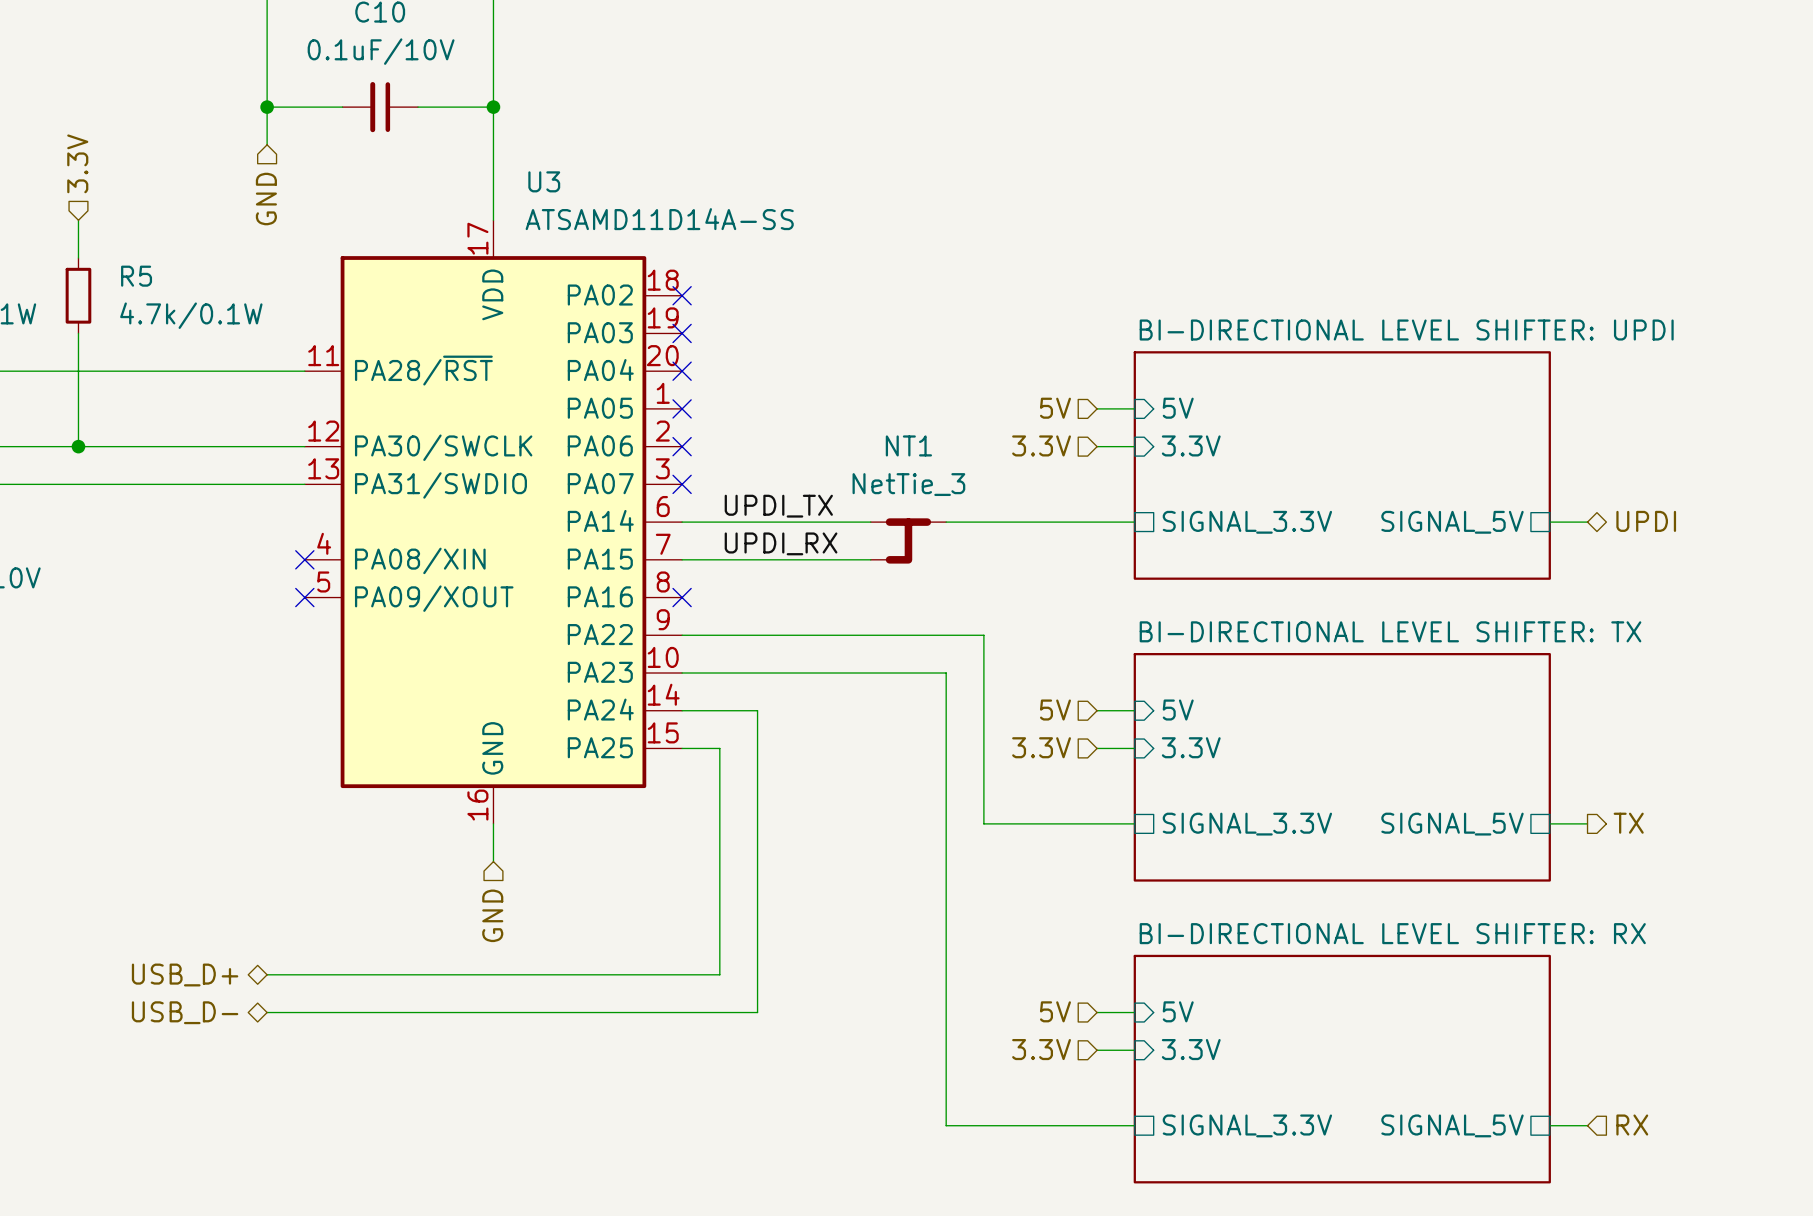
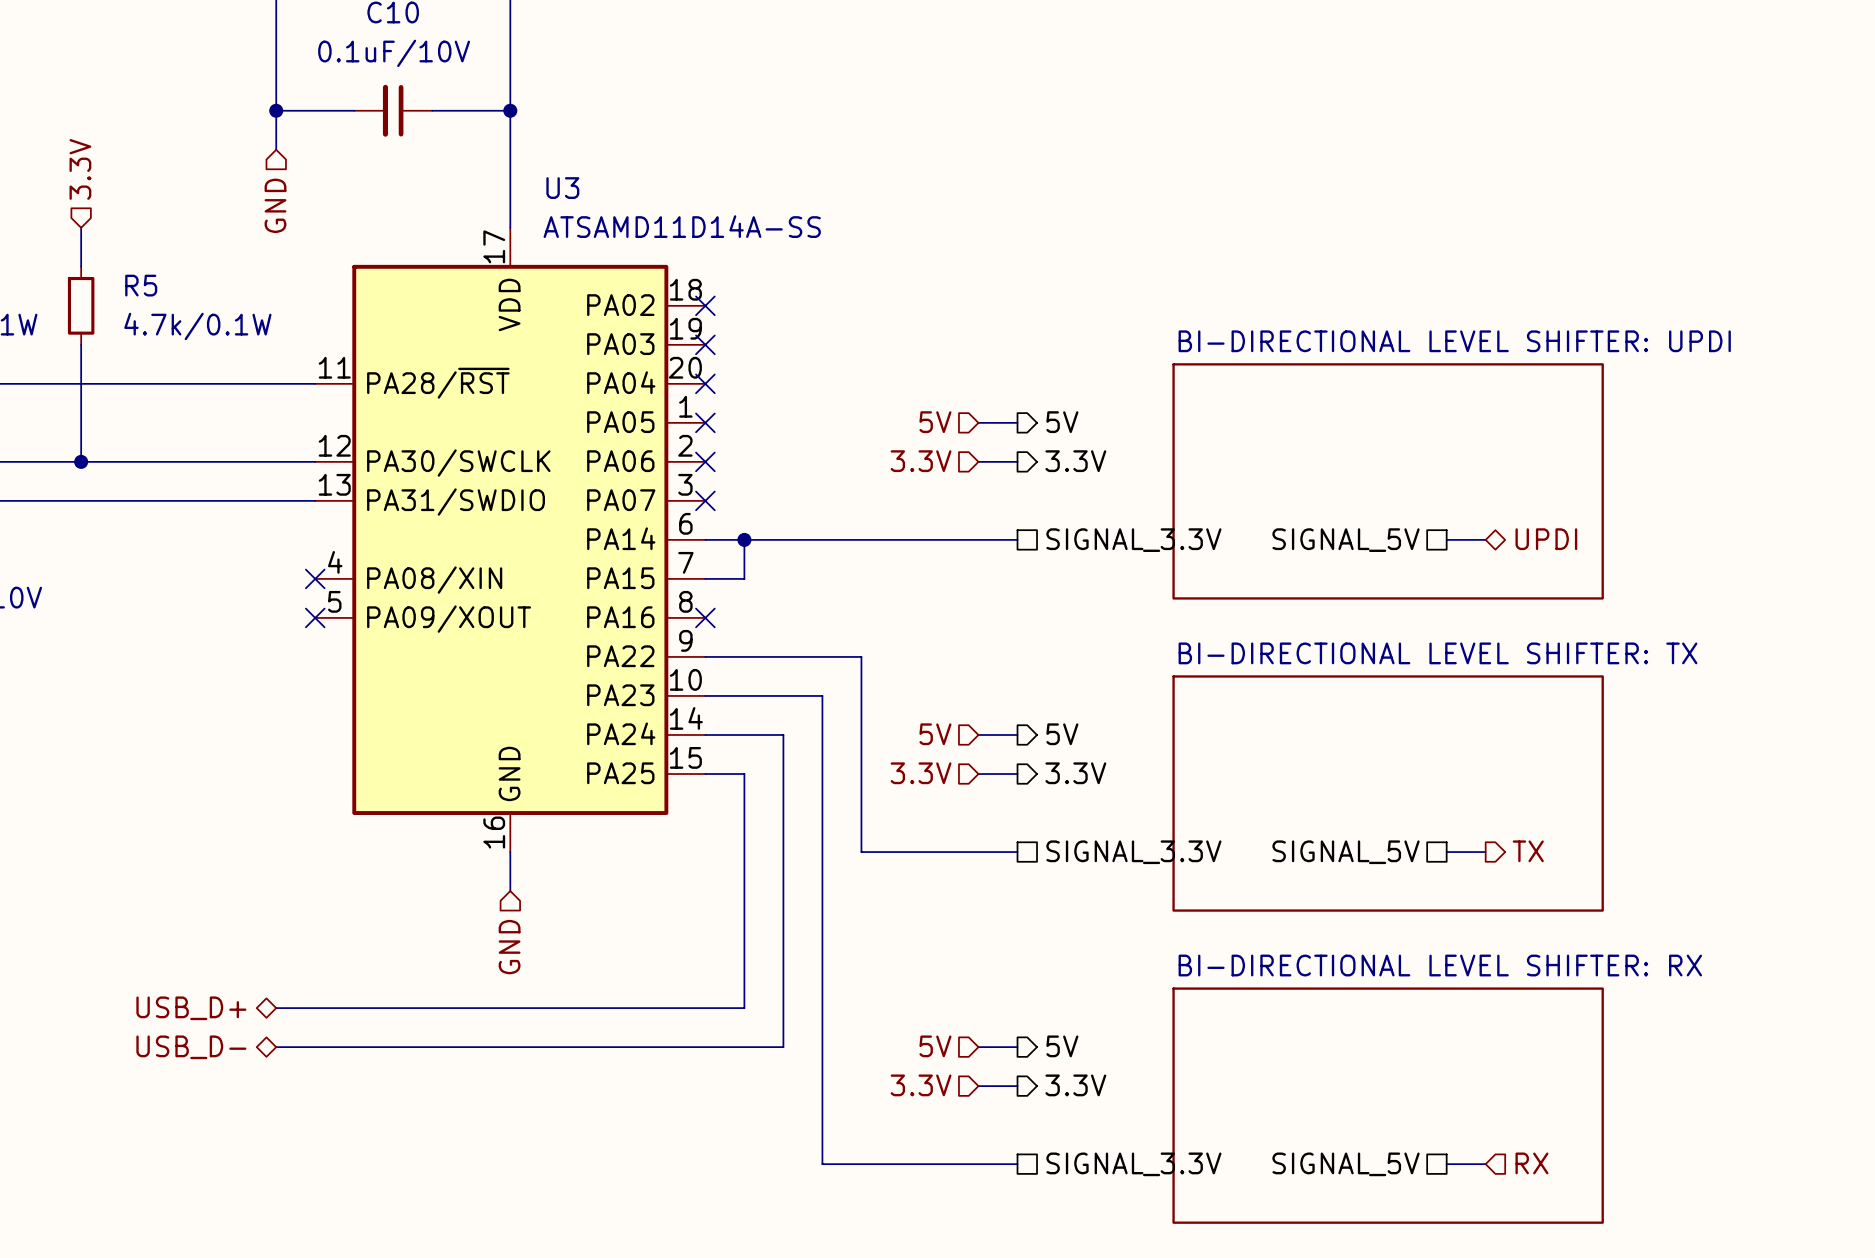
hierarchical label position: 5V (1055, 408) -> 5V (935, 422)
wire: (1097, 408) (1134, 408) -> (978, 422) (1017, 422)
sheet pin position: 5V (1178, 408) -> 5V (1062, 422)
hierarchical label position: 3.3V (1041, 445) -> 3.3V (921, 461)
sheet pin position: 3.3V (1191, 445) -> 3.3V (1075, 461)
wire: (1097, 446) (1134, 446) -> (978, 461) (1017, 461)
label: UPDI_TX (778, 506) -> none
hierarchical label position: UPDI (1646, 521) -> UPDI (1546, 539)
junction: none -> (744, 539)
wire: (983, 522) (1134, 522) -> none
sheet pin position: SIGNAL_3.3V (1247, 522) -> SIGNAL_3.3V (1133, 540)
sheet pin position: SIGNAL_5V (1452, 522) -> SIGNAL_5V (1346, 540)
wire: (1549, 522) (1587, 522) -> (1446, 539) (1485, 539)
NT1: NetTie_3 (908, 540) -> none
label: UPDI_RX (781, 543) -> none
wire: (719, 559) (870, 559) -> (744, 578) (744, 539)
wire: (833, 635) (983, 635) (983, 823) (1134, 823) -> (861, 656) (861, 852) (1017, 852)
wire: (795, 673) (946, 673) (946, 1125) -> (822, 695) (822, 1164) (978, 1164)
hierarchical label position: 5V (1055, 710) -> 5V (935, 734)
wire: (1097, 710) (1134, 710) -> (978, 734) (1017, 734)
sheet pin position: 5V (1178, 710) -> 5V (1062, 734)
hierarchical label position: 3.3V (1041, 747) -> 3.3V (921, 773)
sheet pin position: 3.3V (1191, 747) -> 3.3V (1075, 773)
wire: (1097, 748) (1134, 748) -> (978, 774) (1017, 774)
wire: (1549, 823) (1587, 823) -> (1446, 852) (1485, 852)
hierarchical label position: TX (1628, 823) -> TX (1528, 851)
sheet pin position: SIGNAL_3.3V (1247, 824) -> SIGNAL_3.3V (1133, 852)
sheet pin position: SIGNAL_5V (1452, 824) -> SIGNAL_5V (1346, 852)
hierarchical label position: 5V (1055, 1011) -> 5V (935, 1046)
sheet pin position: 5V (1178, 1011) -> 5V (1062, 1046)
wire: (1097, 1012) (1134, 1012) -> (978, 1047) (1017, 1047)
hierarchical label position: 3.3V (1041, 1049) -> 3.3V (921, 1085)
sheet pin position: 3.3V (1191, 1049) -> 3.3V (1075, 1085)
wire: (1097, 1050) (1134, 1050) -> (978, 1086) (1017, 1086)
wire: (983, 1125) (1134, 1125) -> none
sheet pin position: SIGNAL_3.3V (1247, 1125) -> SIGNAL_3.3V (1133, 1164)
sheet pin position: SIGNAL_5V (1452, 1125) -> SIGNAL_5V (1346, 1164)
wire: (1549, 1125) (1587, 1125) -> (1446, 1164) (1485, 1164)
hierarchical label position: RX (1632, 1125) -> RX (1531, 1163)

